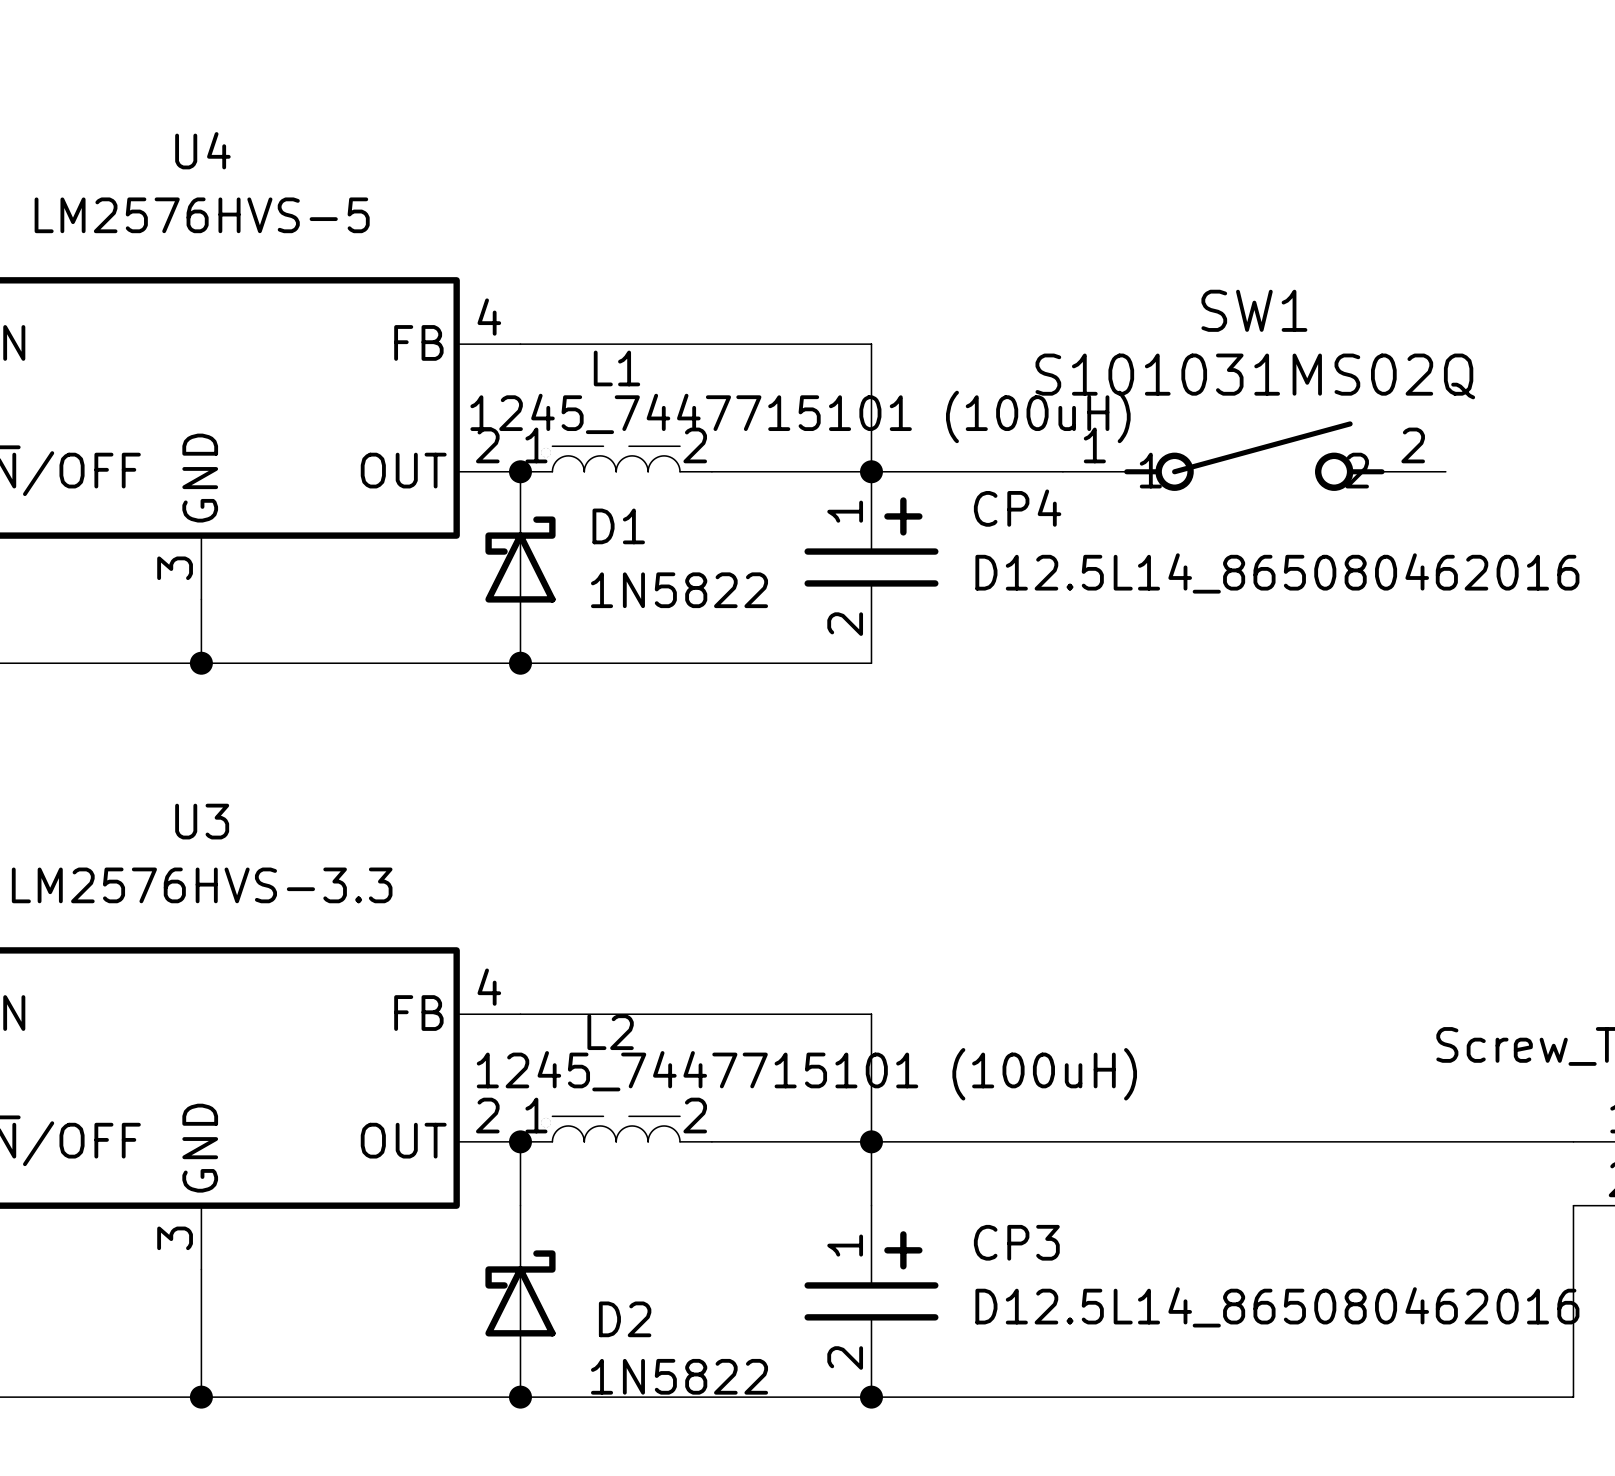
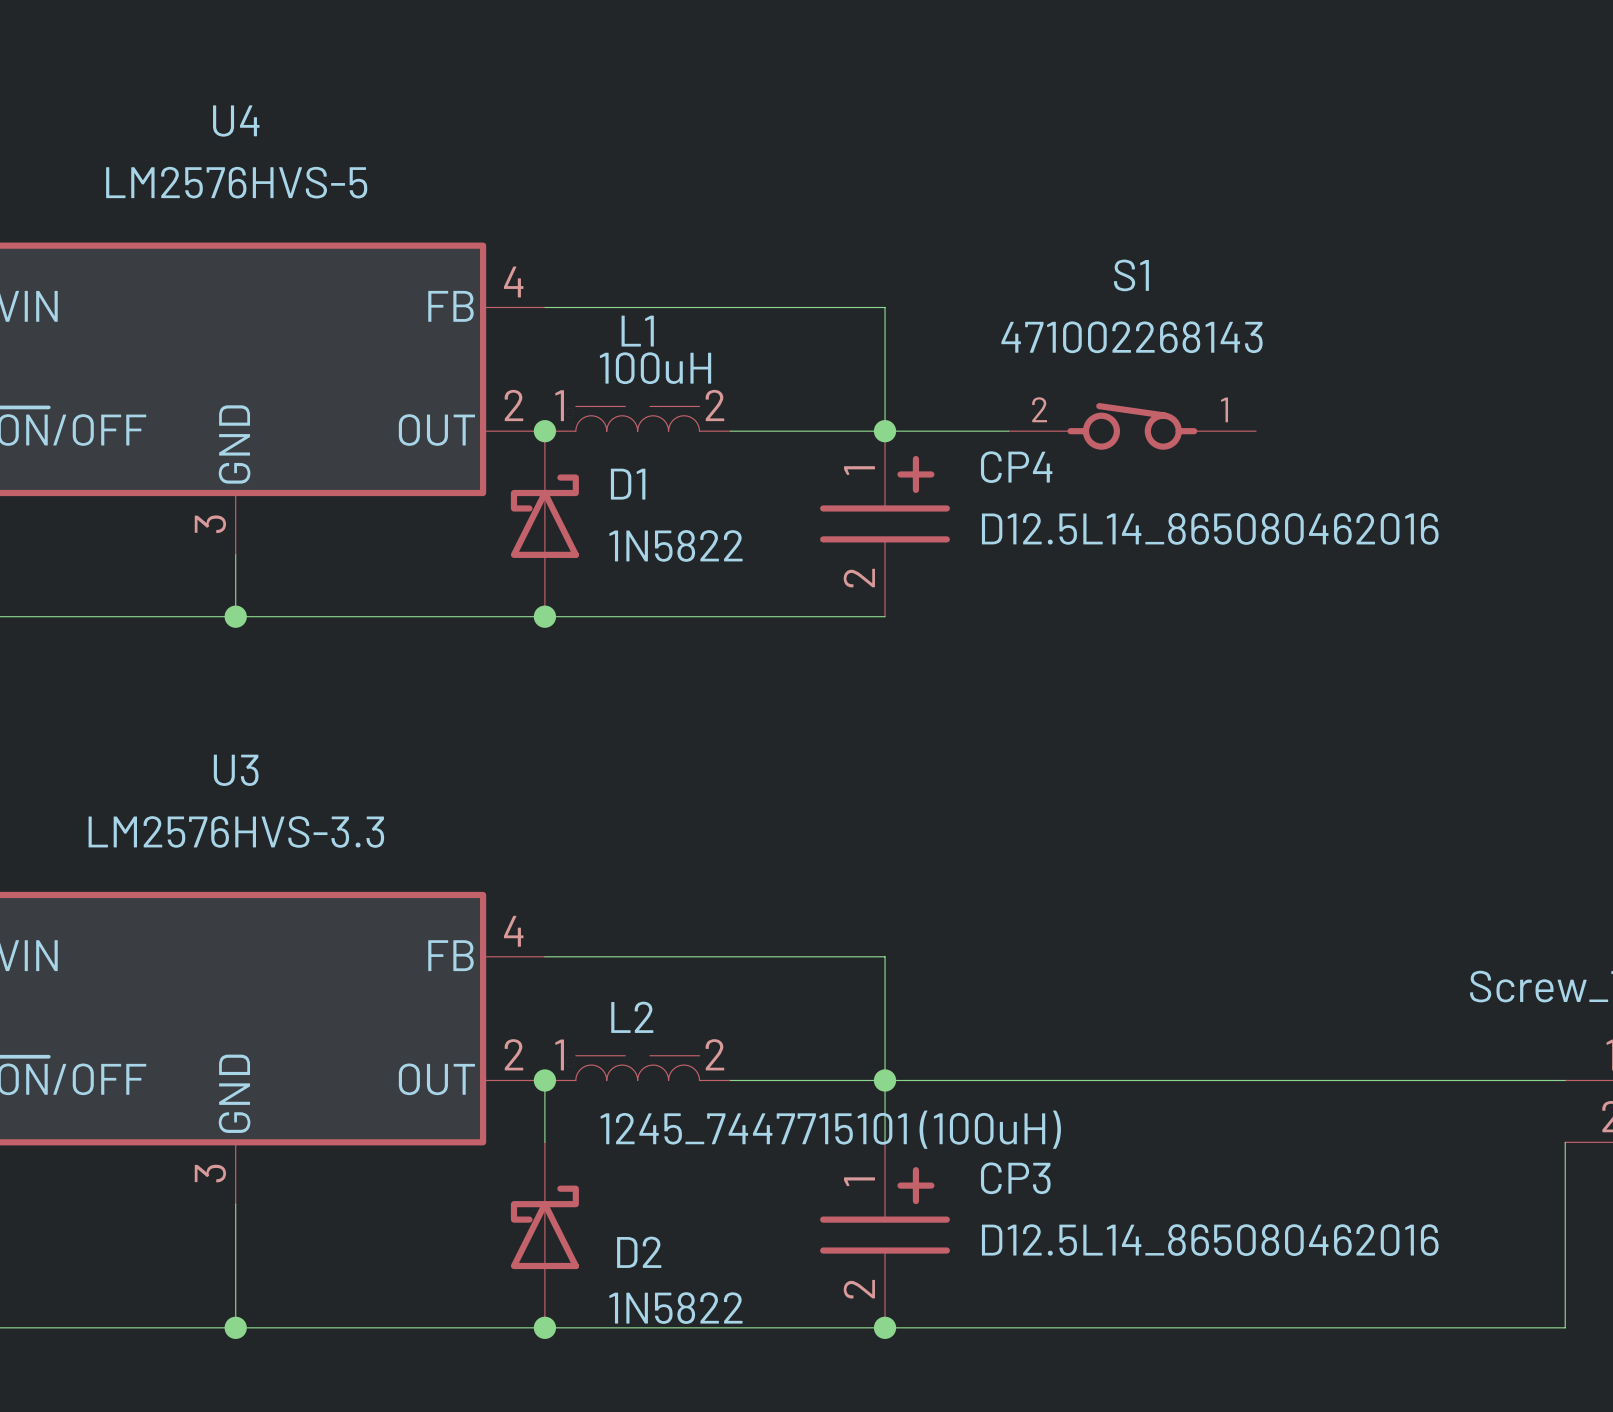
L1 value: 1245_7447715101 (100uH) (800, 416) -> 100uH (655, 368)
SW1: S101031MS02Q (1254, 456) -> none
S1: none -> 471002268143 (1132, 426)
L2 name position: L2 (610, 1032) -> L2 (632, 1017)
L2 value position: 1245_7447715101 (100uH) (806, 1074) -> 1245_7447715101 (100uH) (830, 1129)

